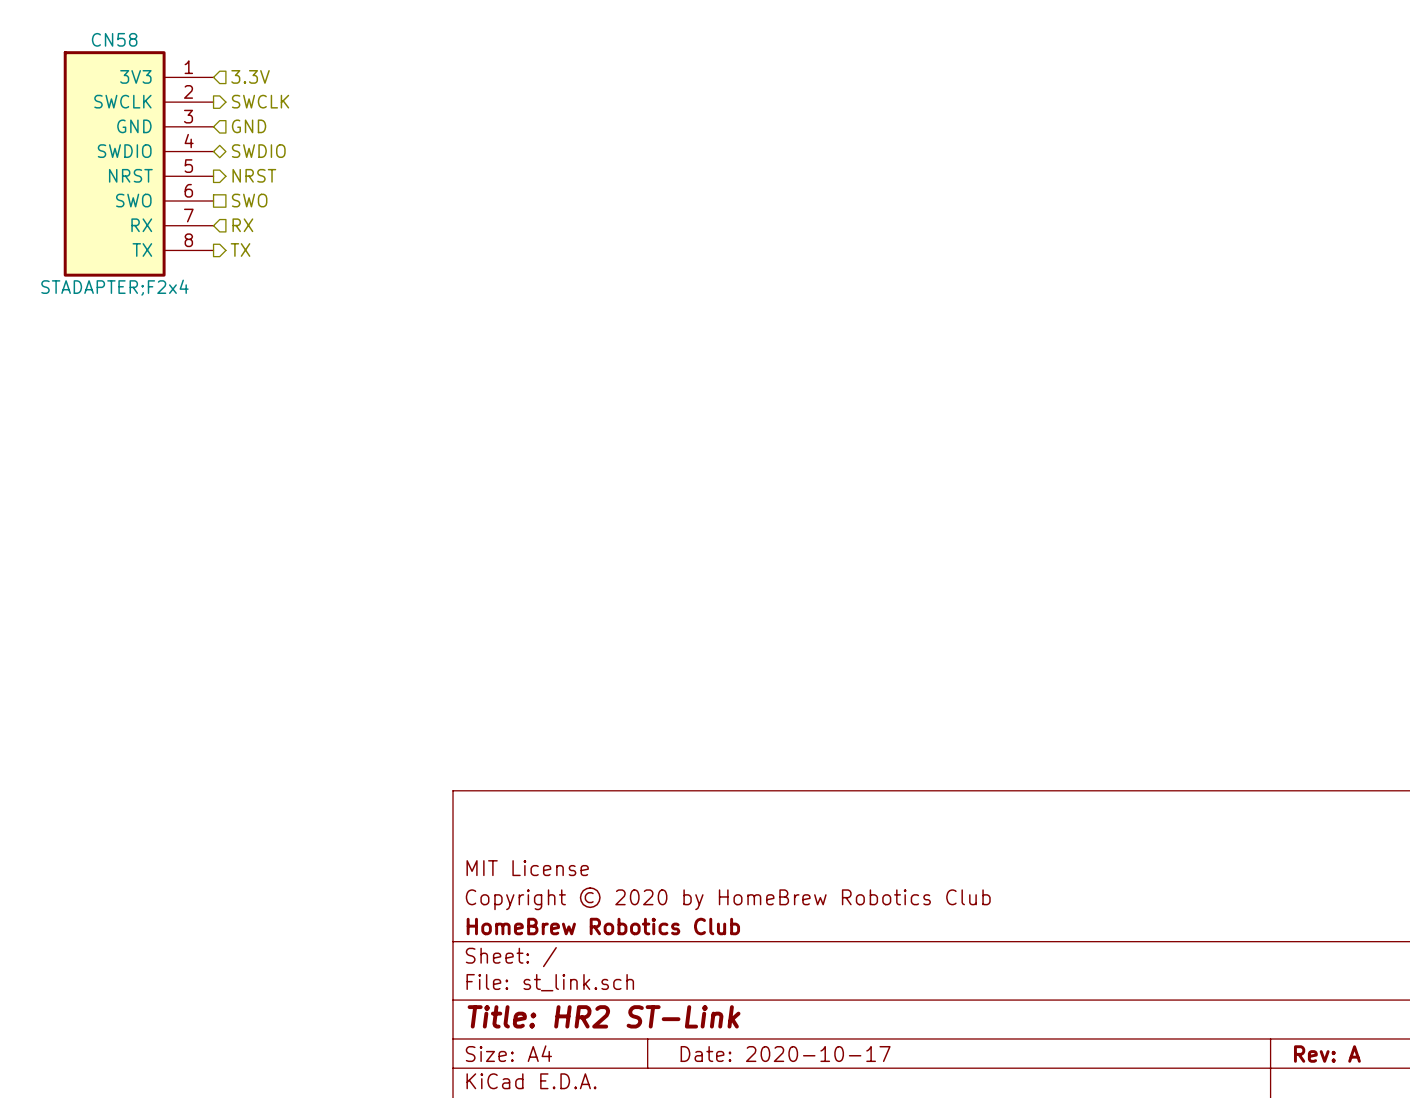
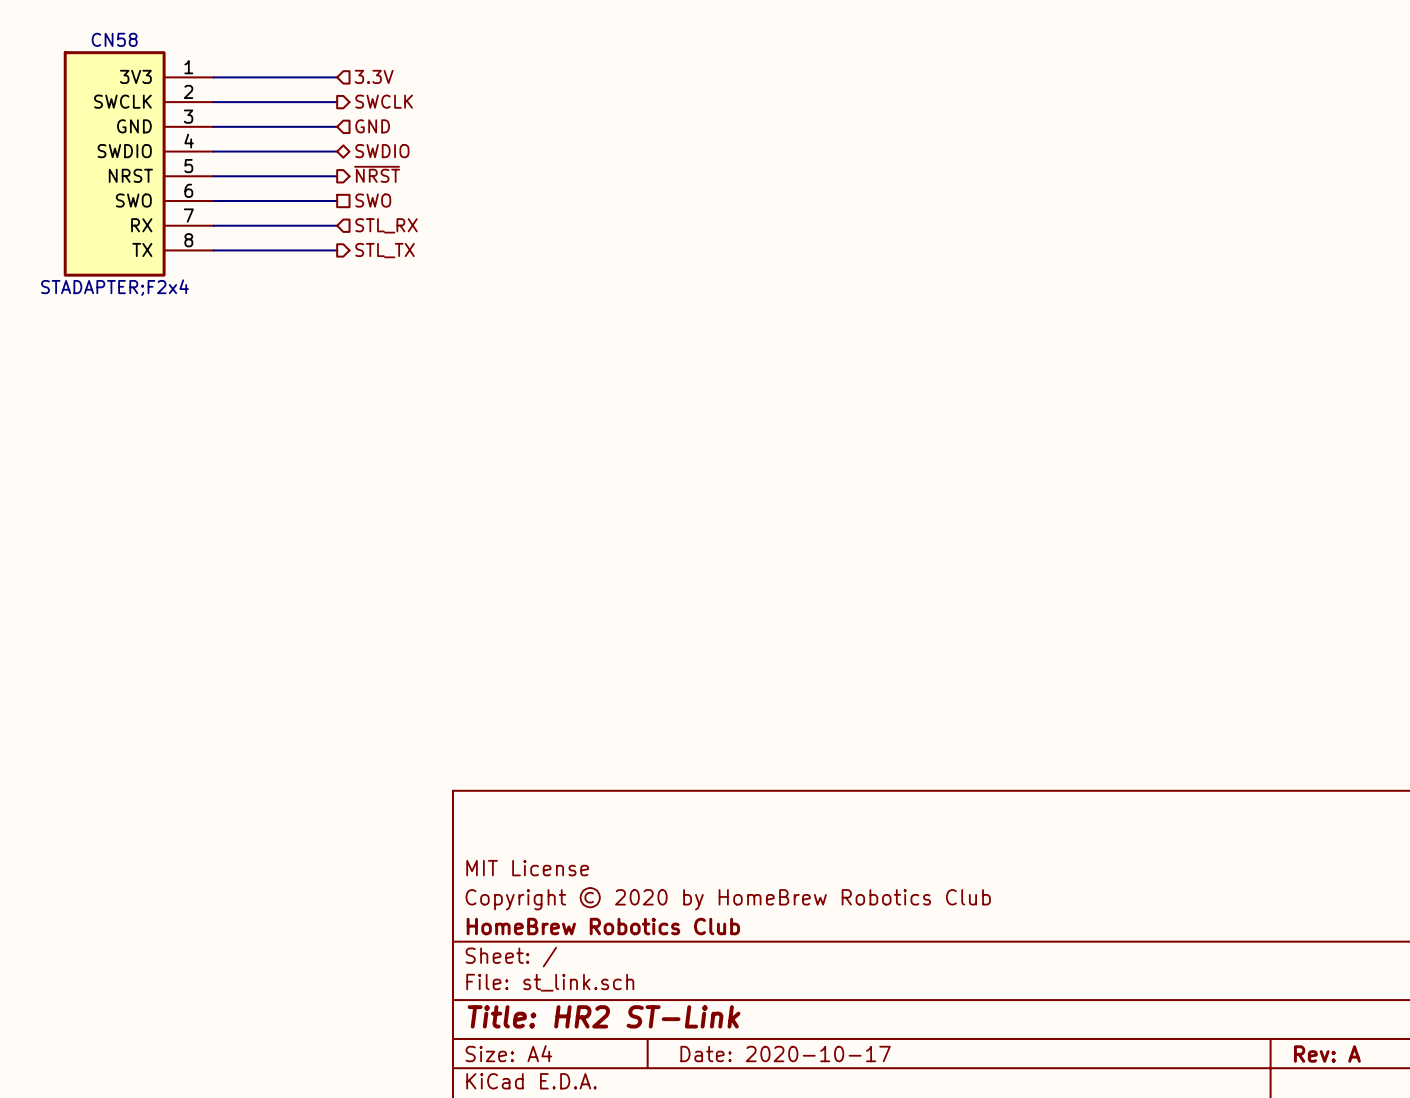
hierarchical label position: 3.3V (250, 76) -> 3.3V (374, 76)
wire: none -> (213, 77) (337, 77)
hierarchical label position: SWCLK (260, 101) -> SWCLK (384, 101)
wire: none -> (213, 102) (337, 102)
wire: none -> (213, 126) (337, 126)
hierarchical label position: GND (249, 126) -> GND (372, 126)
wire: none -> (213, 151) (337, 151)
hierarchical label position: SWDIO (258, 151) -> SWDIO (382, 151)
hierarchical label: none -> ~{NRST} (377, 174)
hierarchical label: NRST (254, 175) -> none
wire: none -> (213, 176) (337, 176)
hierarchical label position: SWO (249, 200) -> SWO (373, 200)
wire: none -> (213, 201) (337, 201)
wire: none -> (213, 225) (337, 225)
hierarchical label: RX (242, 225) -> none
hierarchical label: none -> STL_RX (386, 225)
hierarchical label: TX (240, 249) -> none
wire: none -> (213, 250) (337, 250)
hierarchical label: none -> STL_TX (385, 250)

